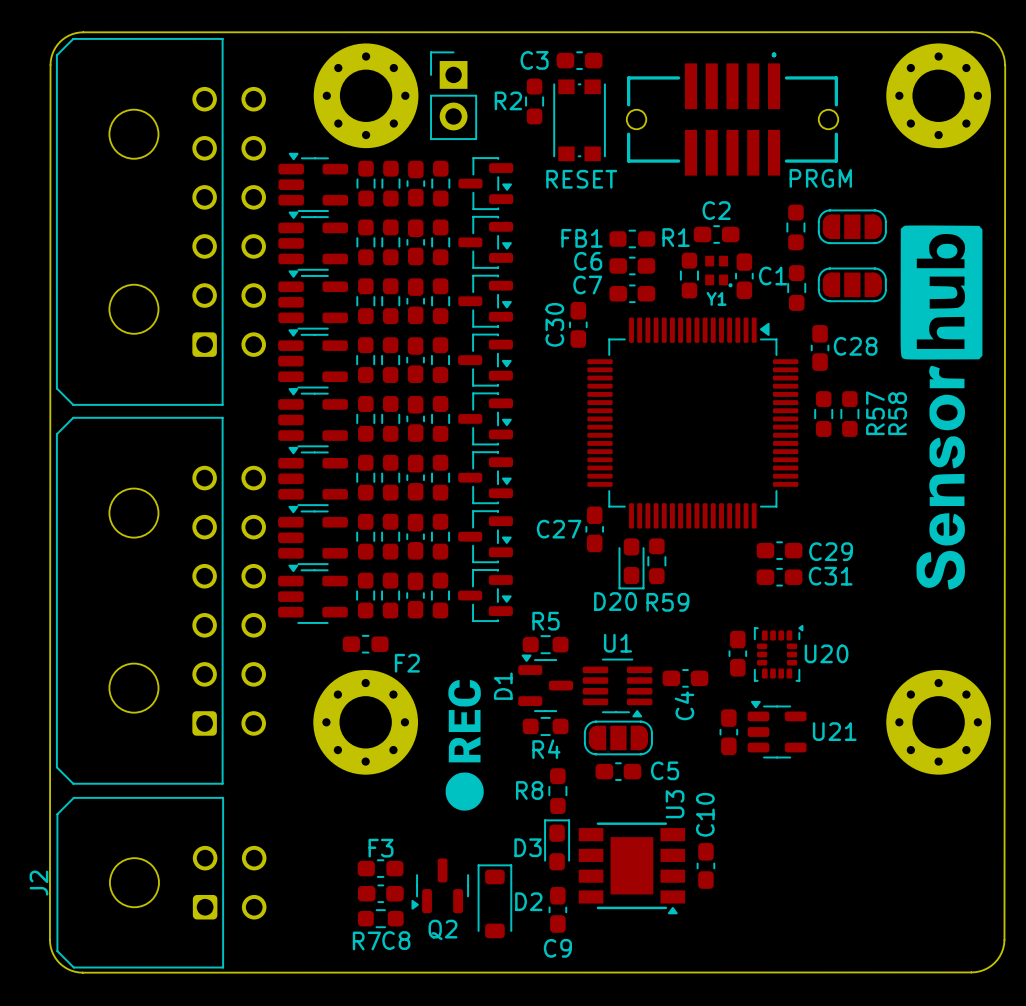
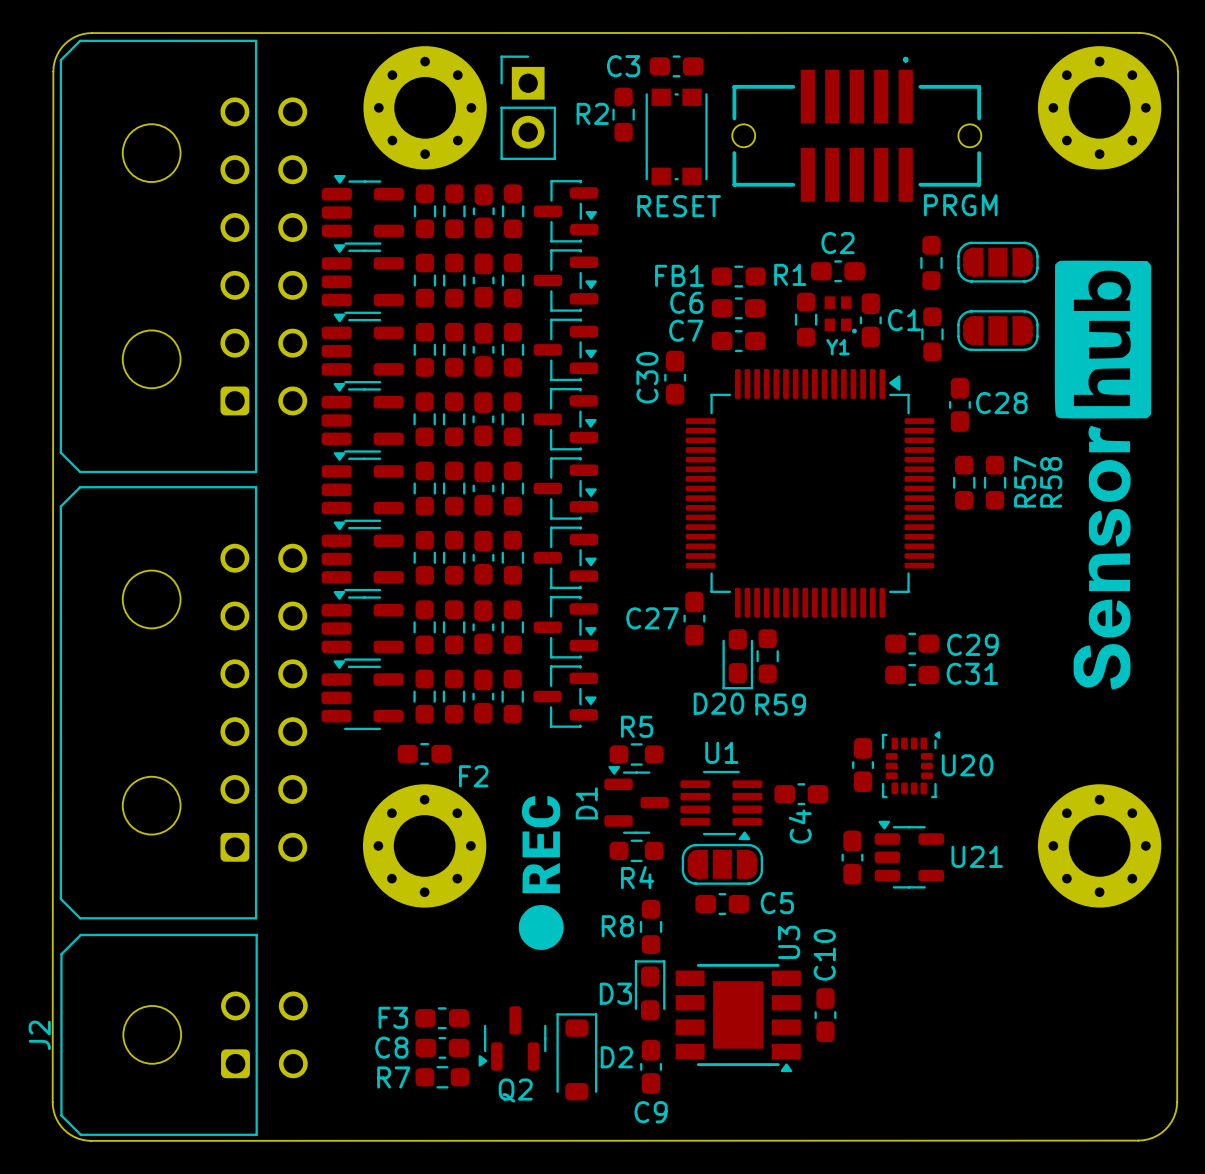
F3 name position: F3 (381, 848) -> F3 (393, 1017)
R7 name position: R7 (366, 940) -> R7 (393, 1077)
C8 name position: C8 (396, 940) -> C8 (391, 1047)

